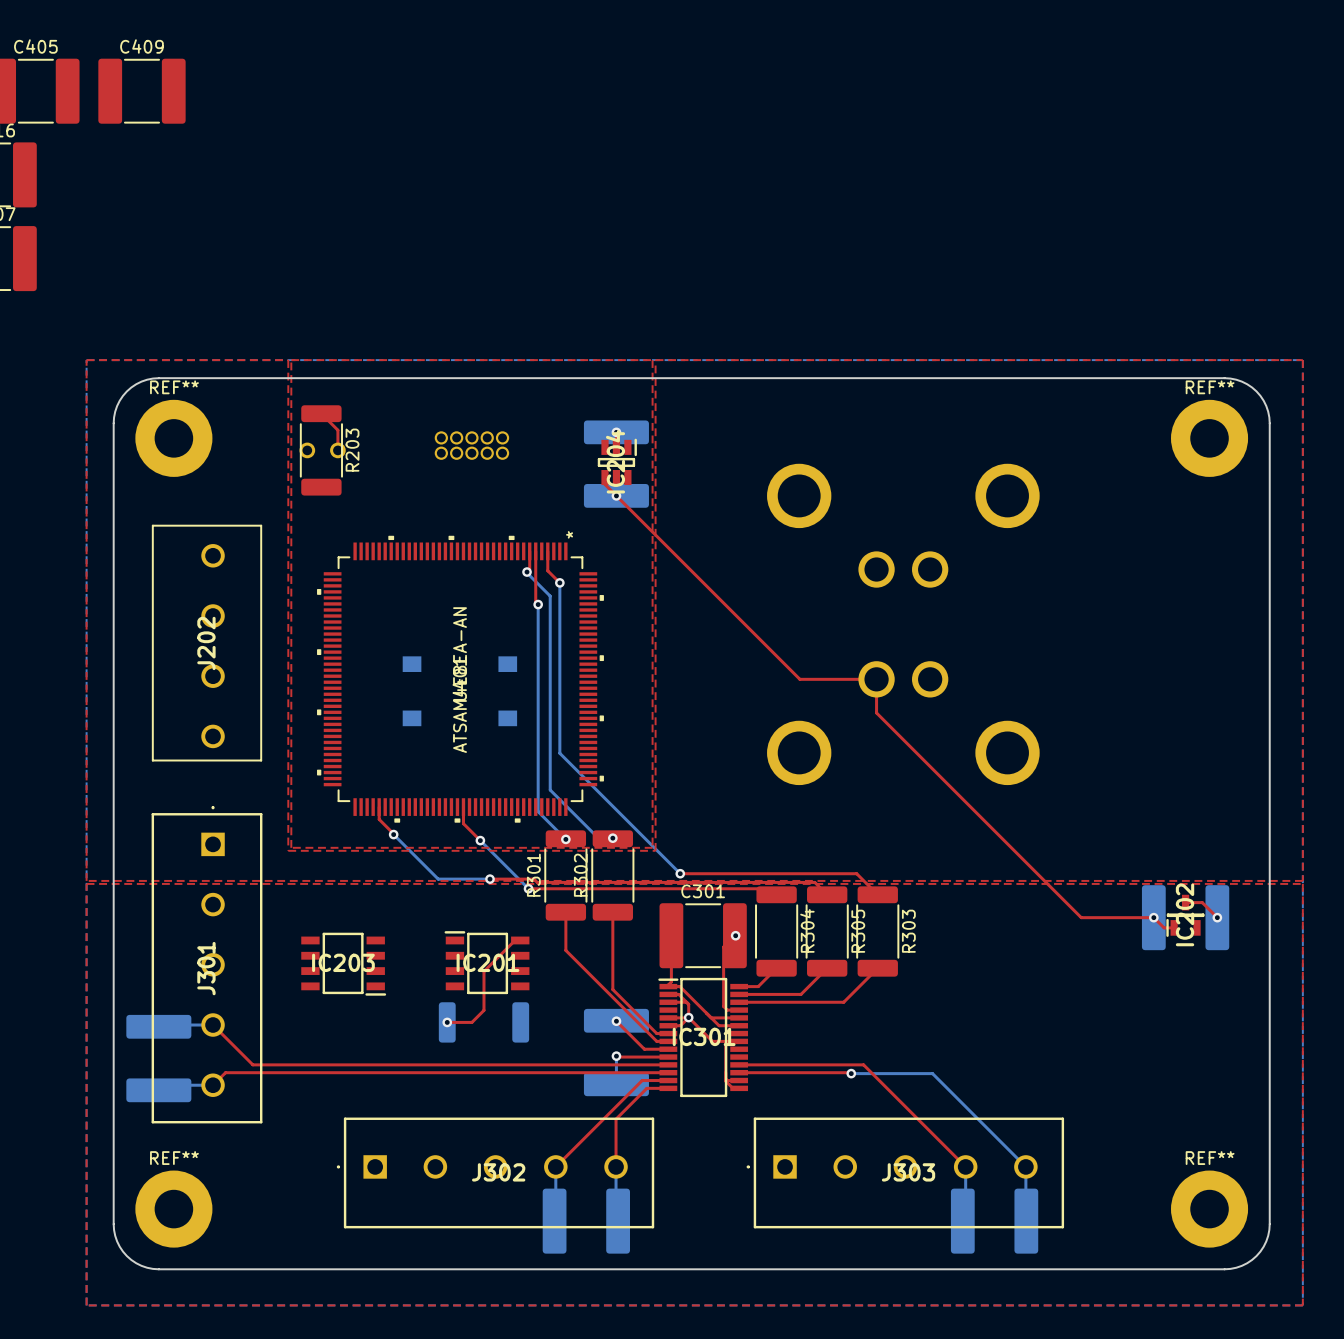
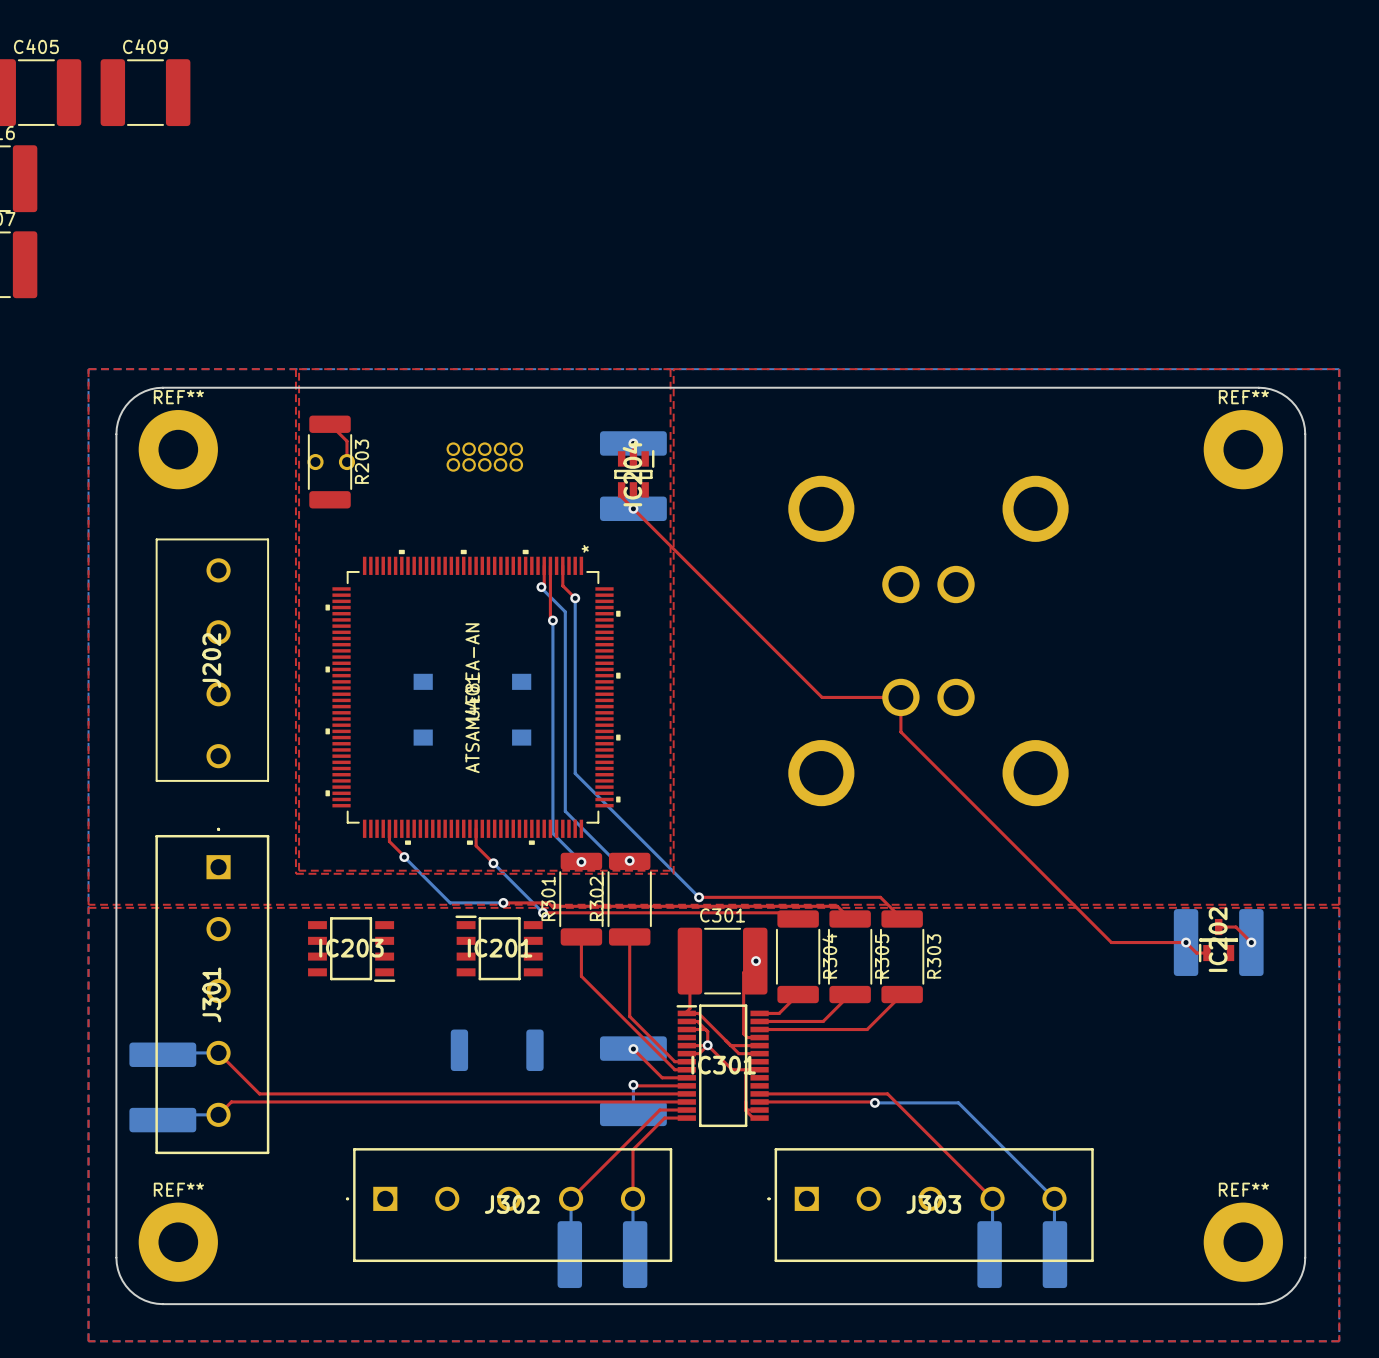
top track: (520, 940) (514, 940) (483, 971) (483, 1010) (471, 1022) (447, 1022) -> none
IC201 position: (486, 962) -> (499, 947)
IC203 position: (343, 964) -> (351, 949)
via: (447, 1022) -> none

